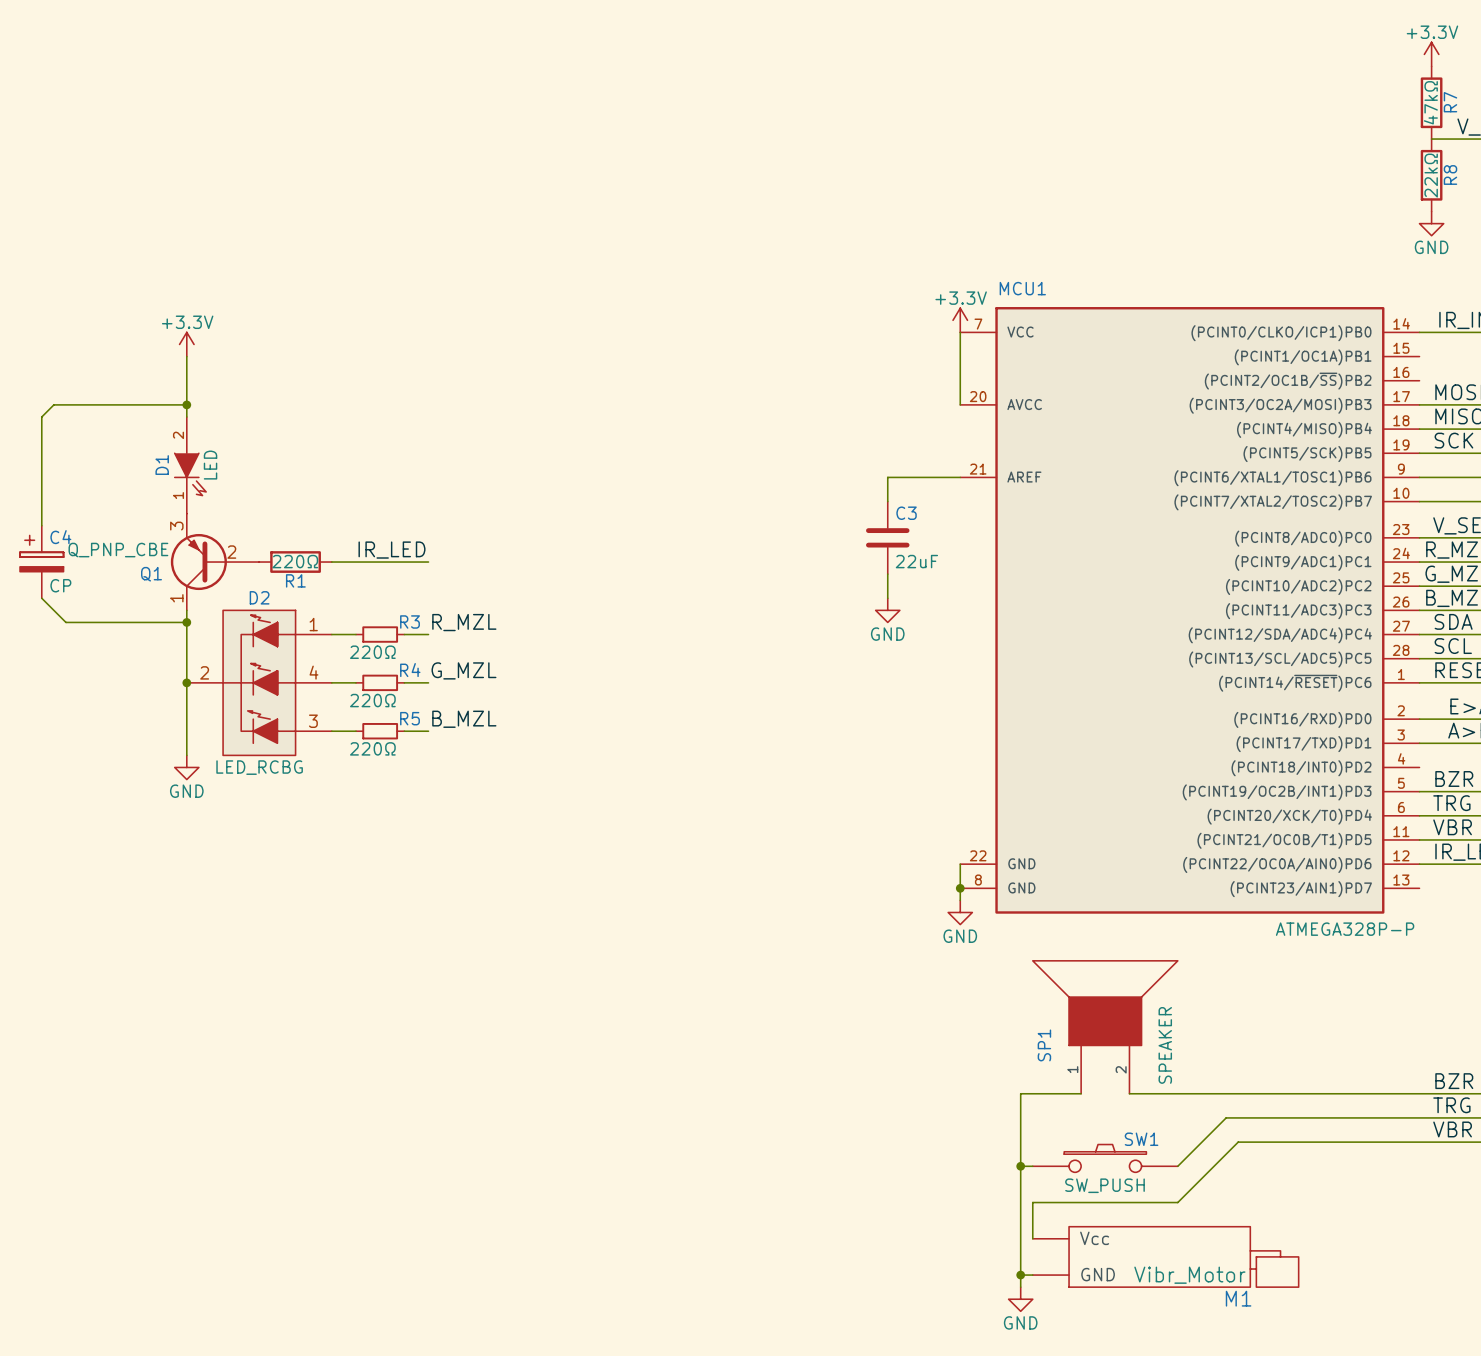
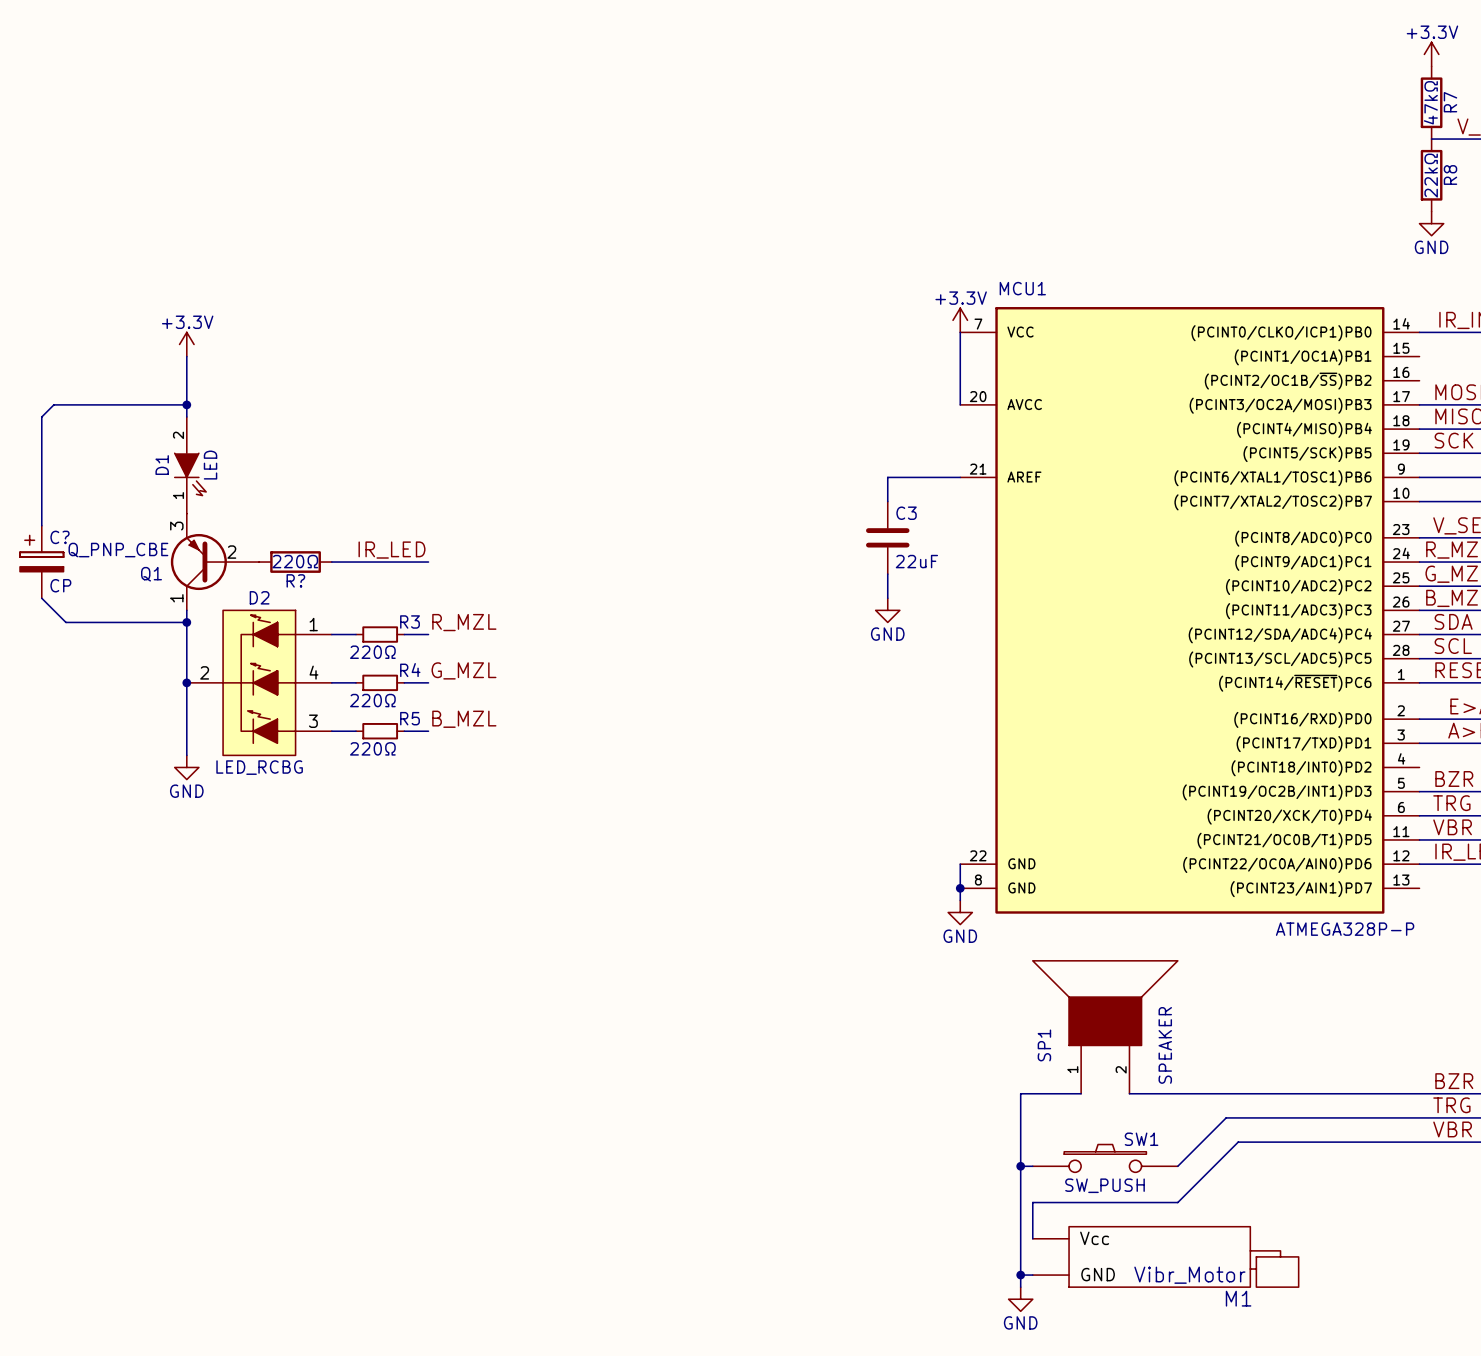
C4 name: C4 (60, 537) -> C? (60, 537)
R1 name: R1 (295, 580) -> R? (295, 580)

